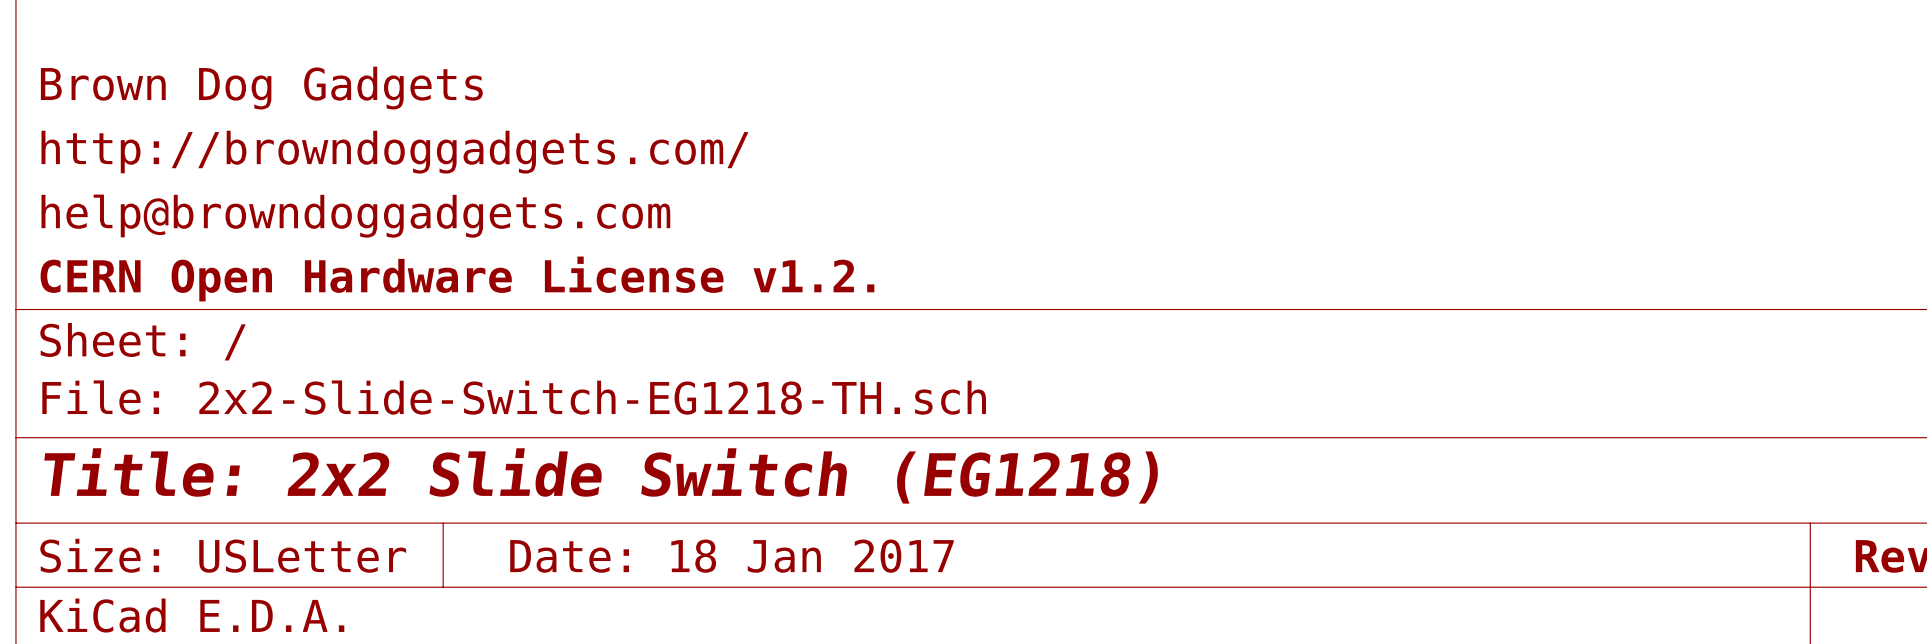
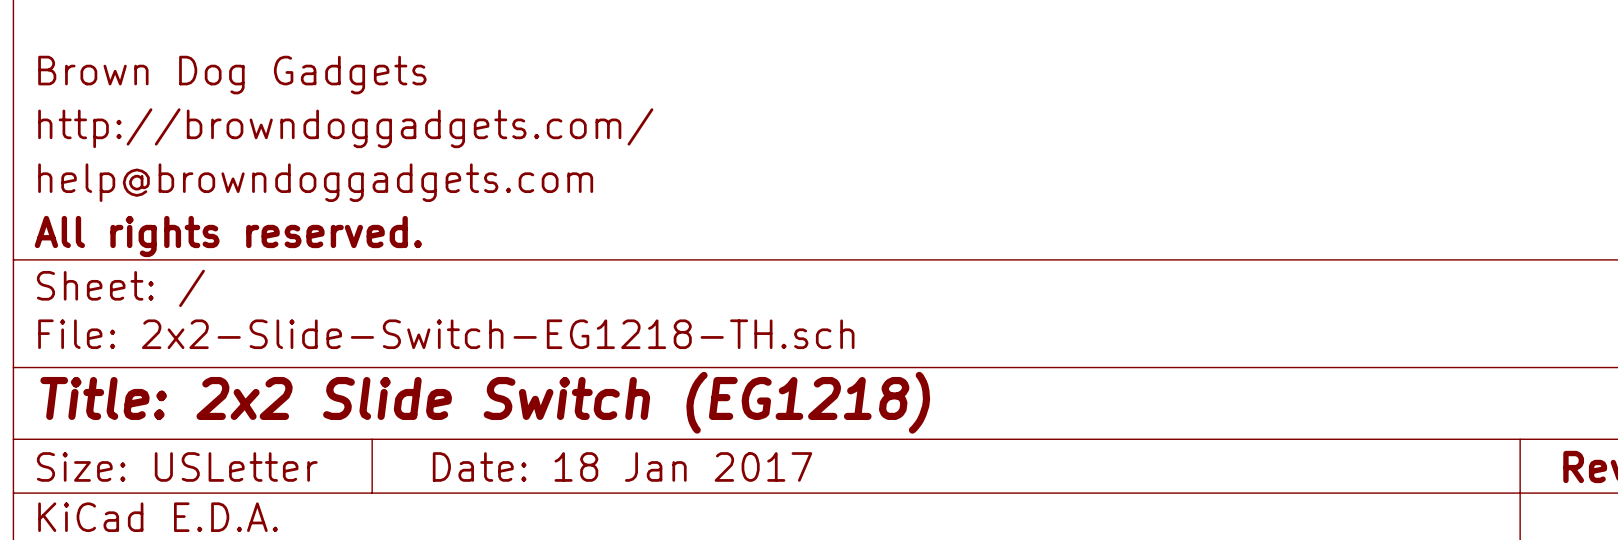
title block: CERN Open Hardware License v1.2. (457, 279) -> All rights reserved. (228, 236)

